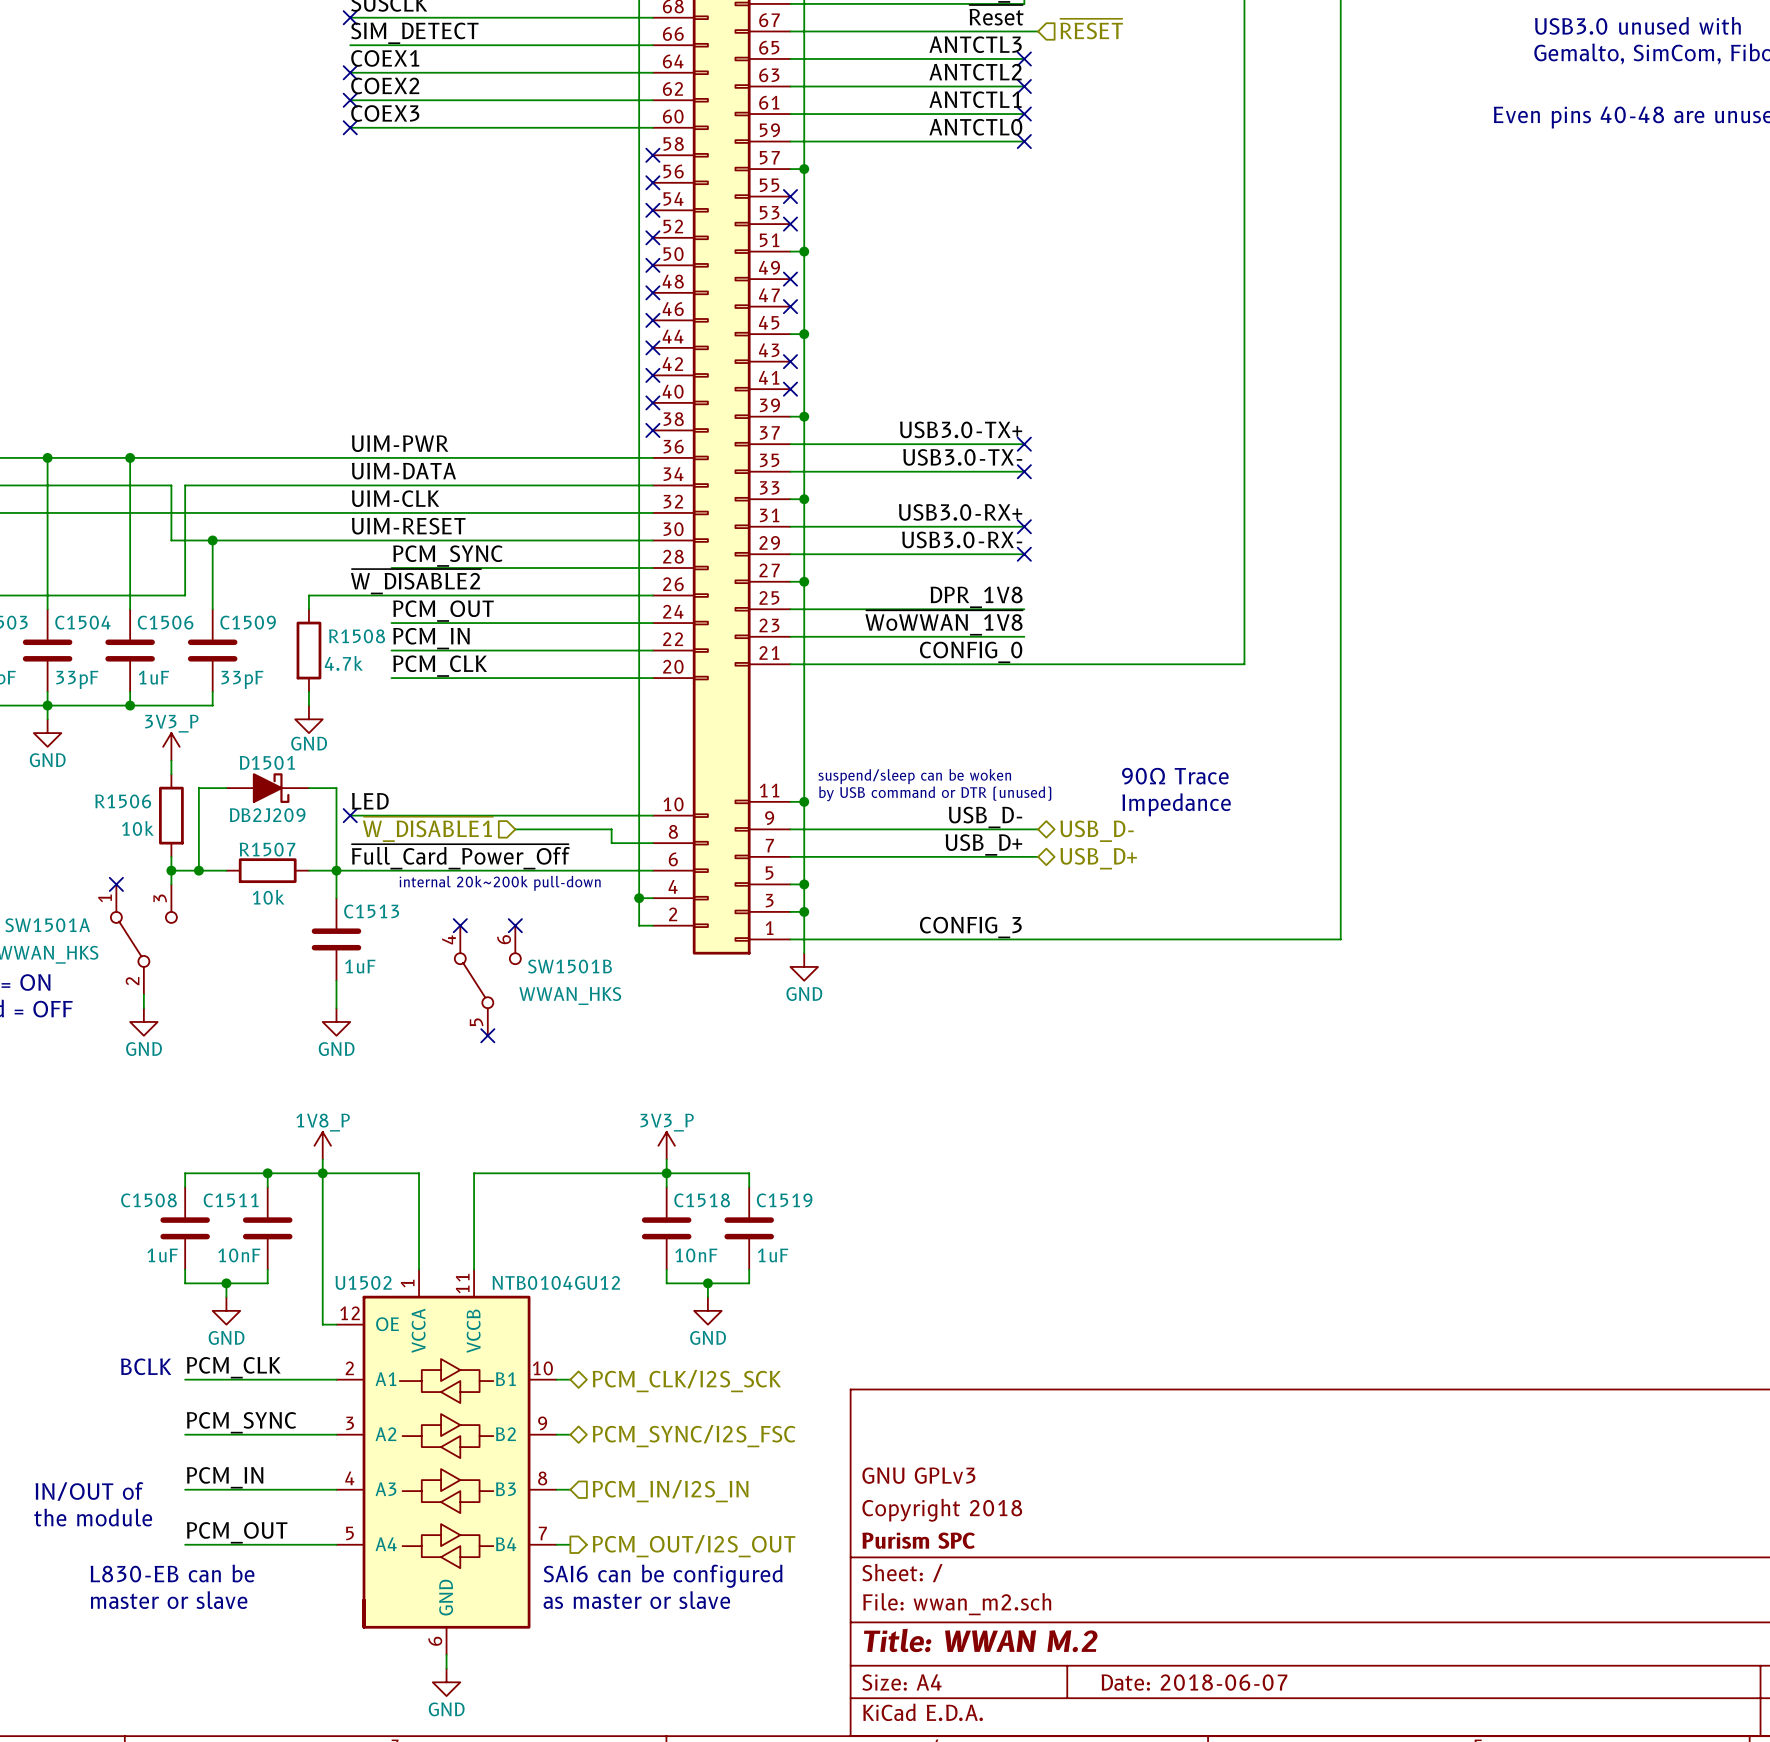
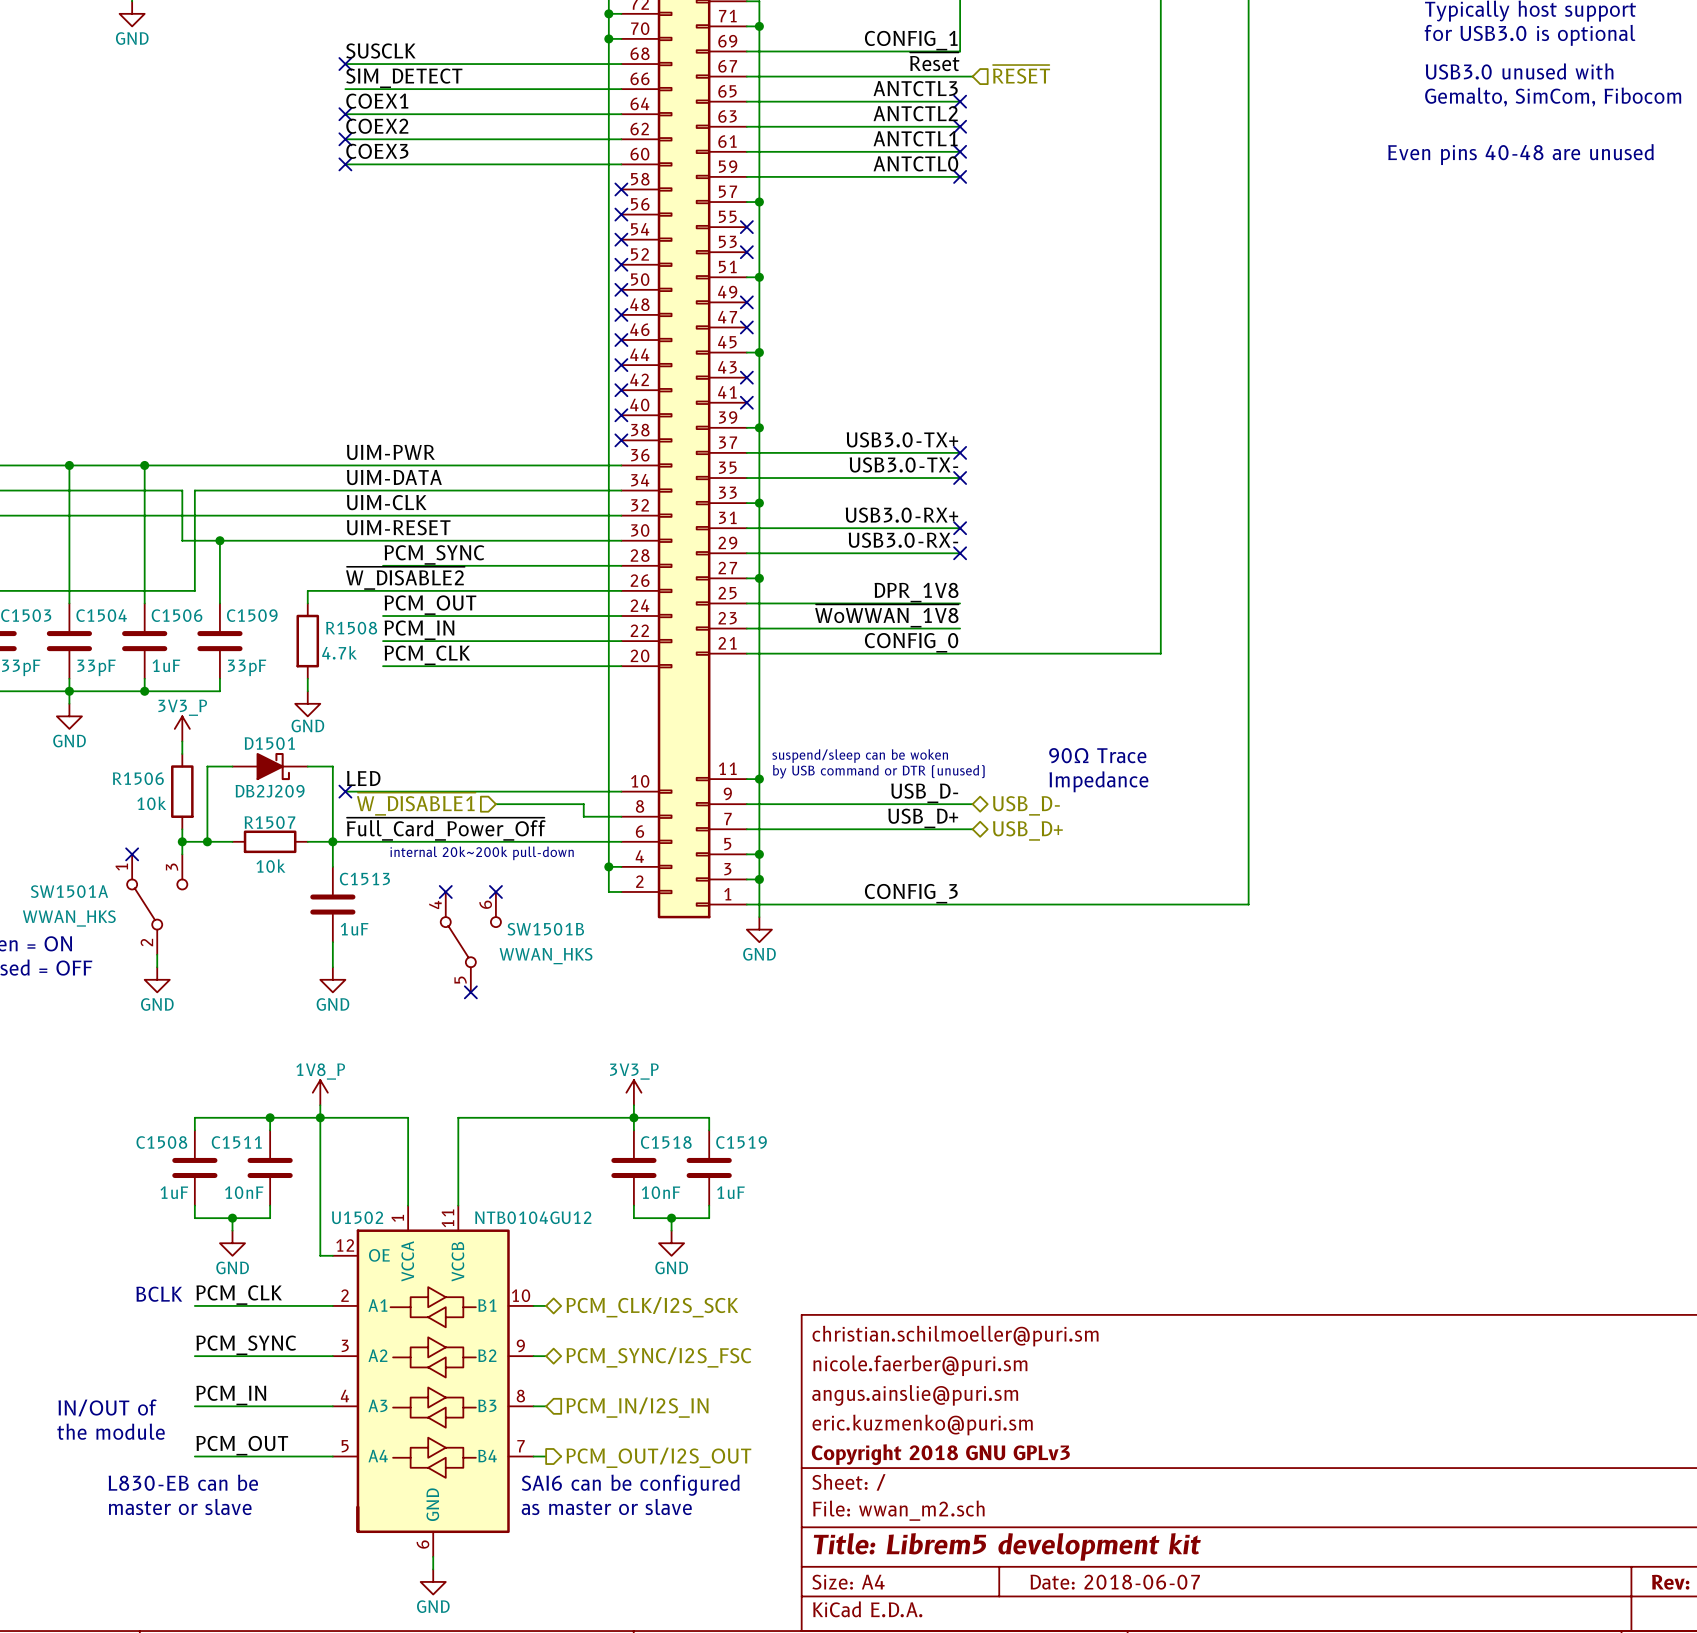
title block: none -> christian.schilmoeller@puri.sm (955, 1336)
title block: none -> nicole.faerber@puri.sm (920, 1365)
title block: GNU GPLv3 (918, 1475) -> angus.ainslie@puri.sm (915, 1395)
title block: Copyright 2018 (942, 1510) -> eric.kuzmenko@puri.sm (922, 1424)
title block: Purism SPC (918, 1540) -> Copyright 2018 GNU GPLv3 (940, 1454)
title block: Title: WWAN M.2 (980, 1640) -> Title: Librem5 development kit (1007, 1546)

